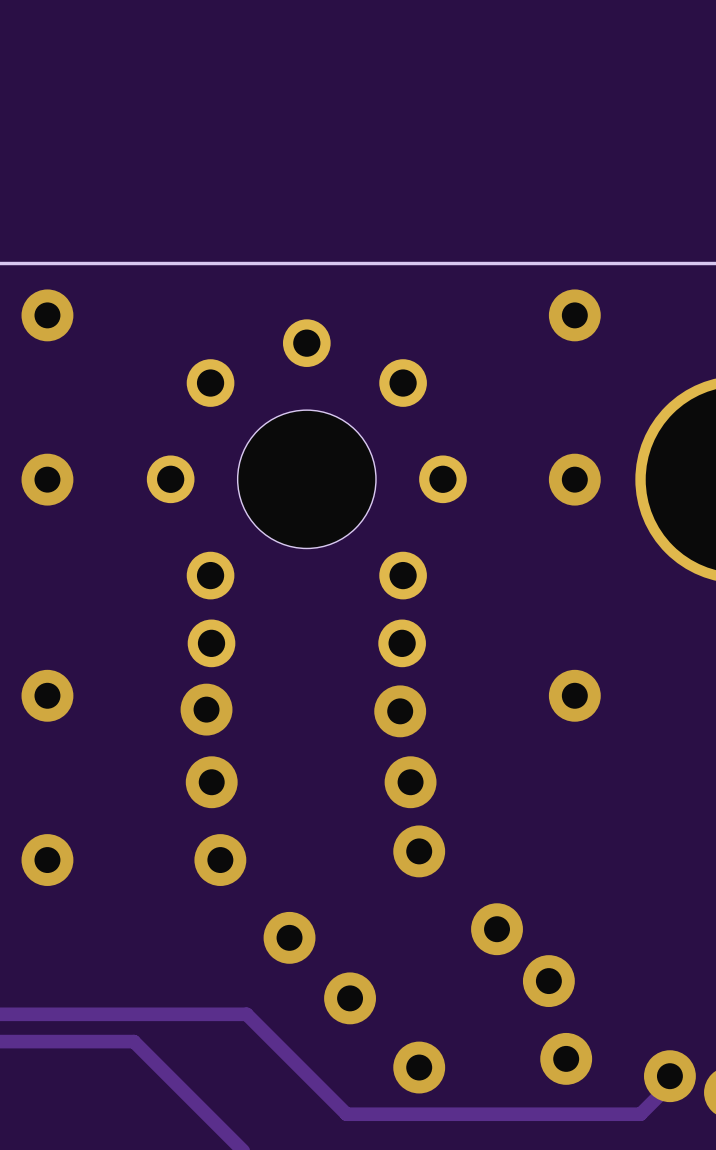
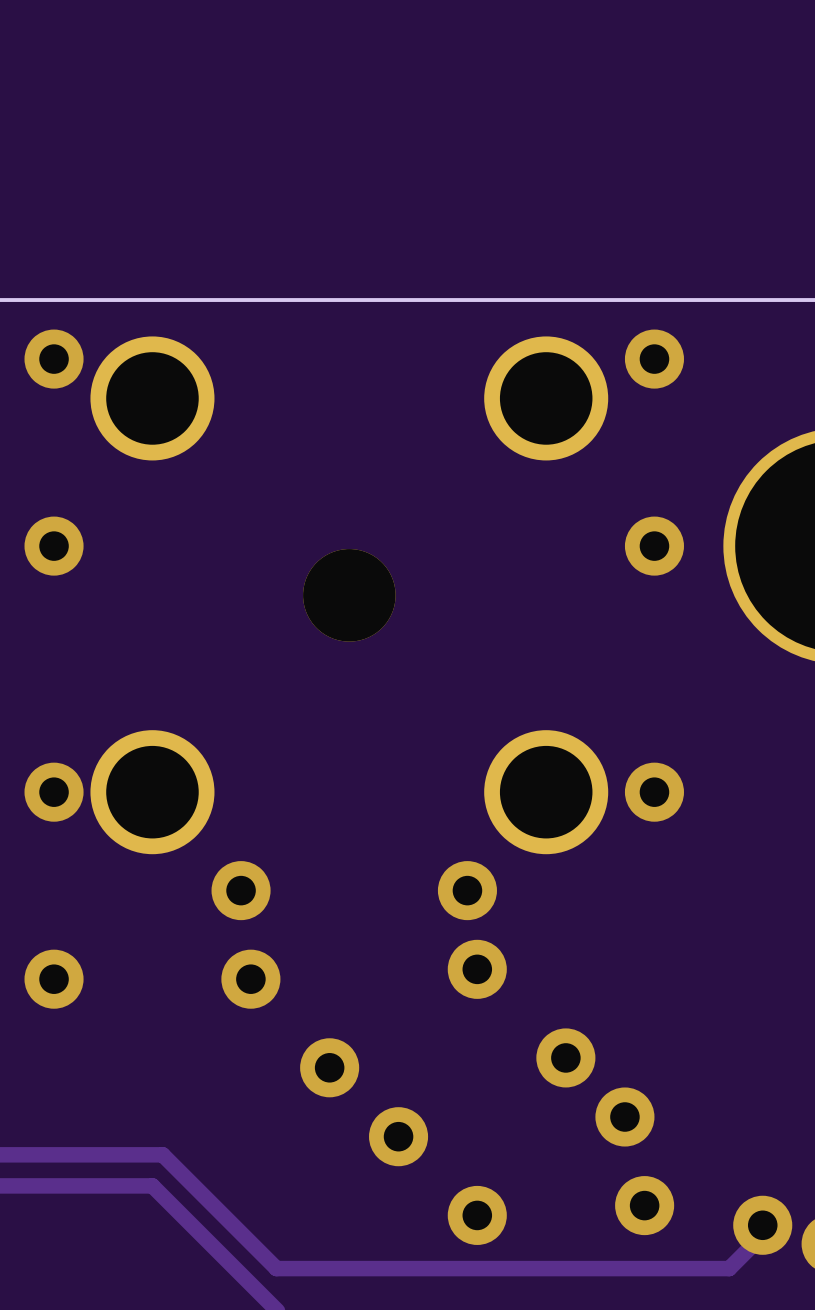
part: (306, 479) -> none
part: (306, 493) -> none
part: none -> (349, 595)
via: (206, 709) -> none
via: (400, 711) -> none
track: (142, 1014) (246, 1014) (346, 1114) -> (162, 1154) (276, 1268) (394, 1268)

